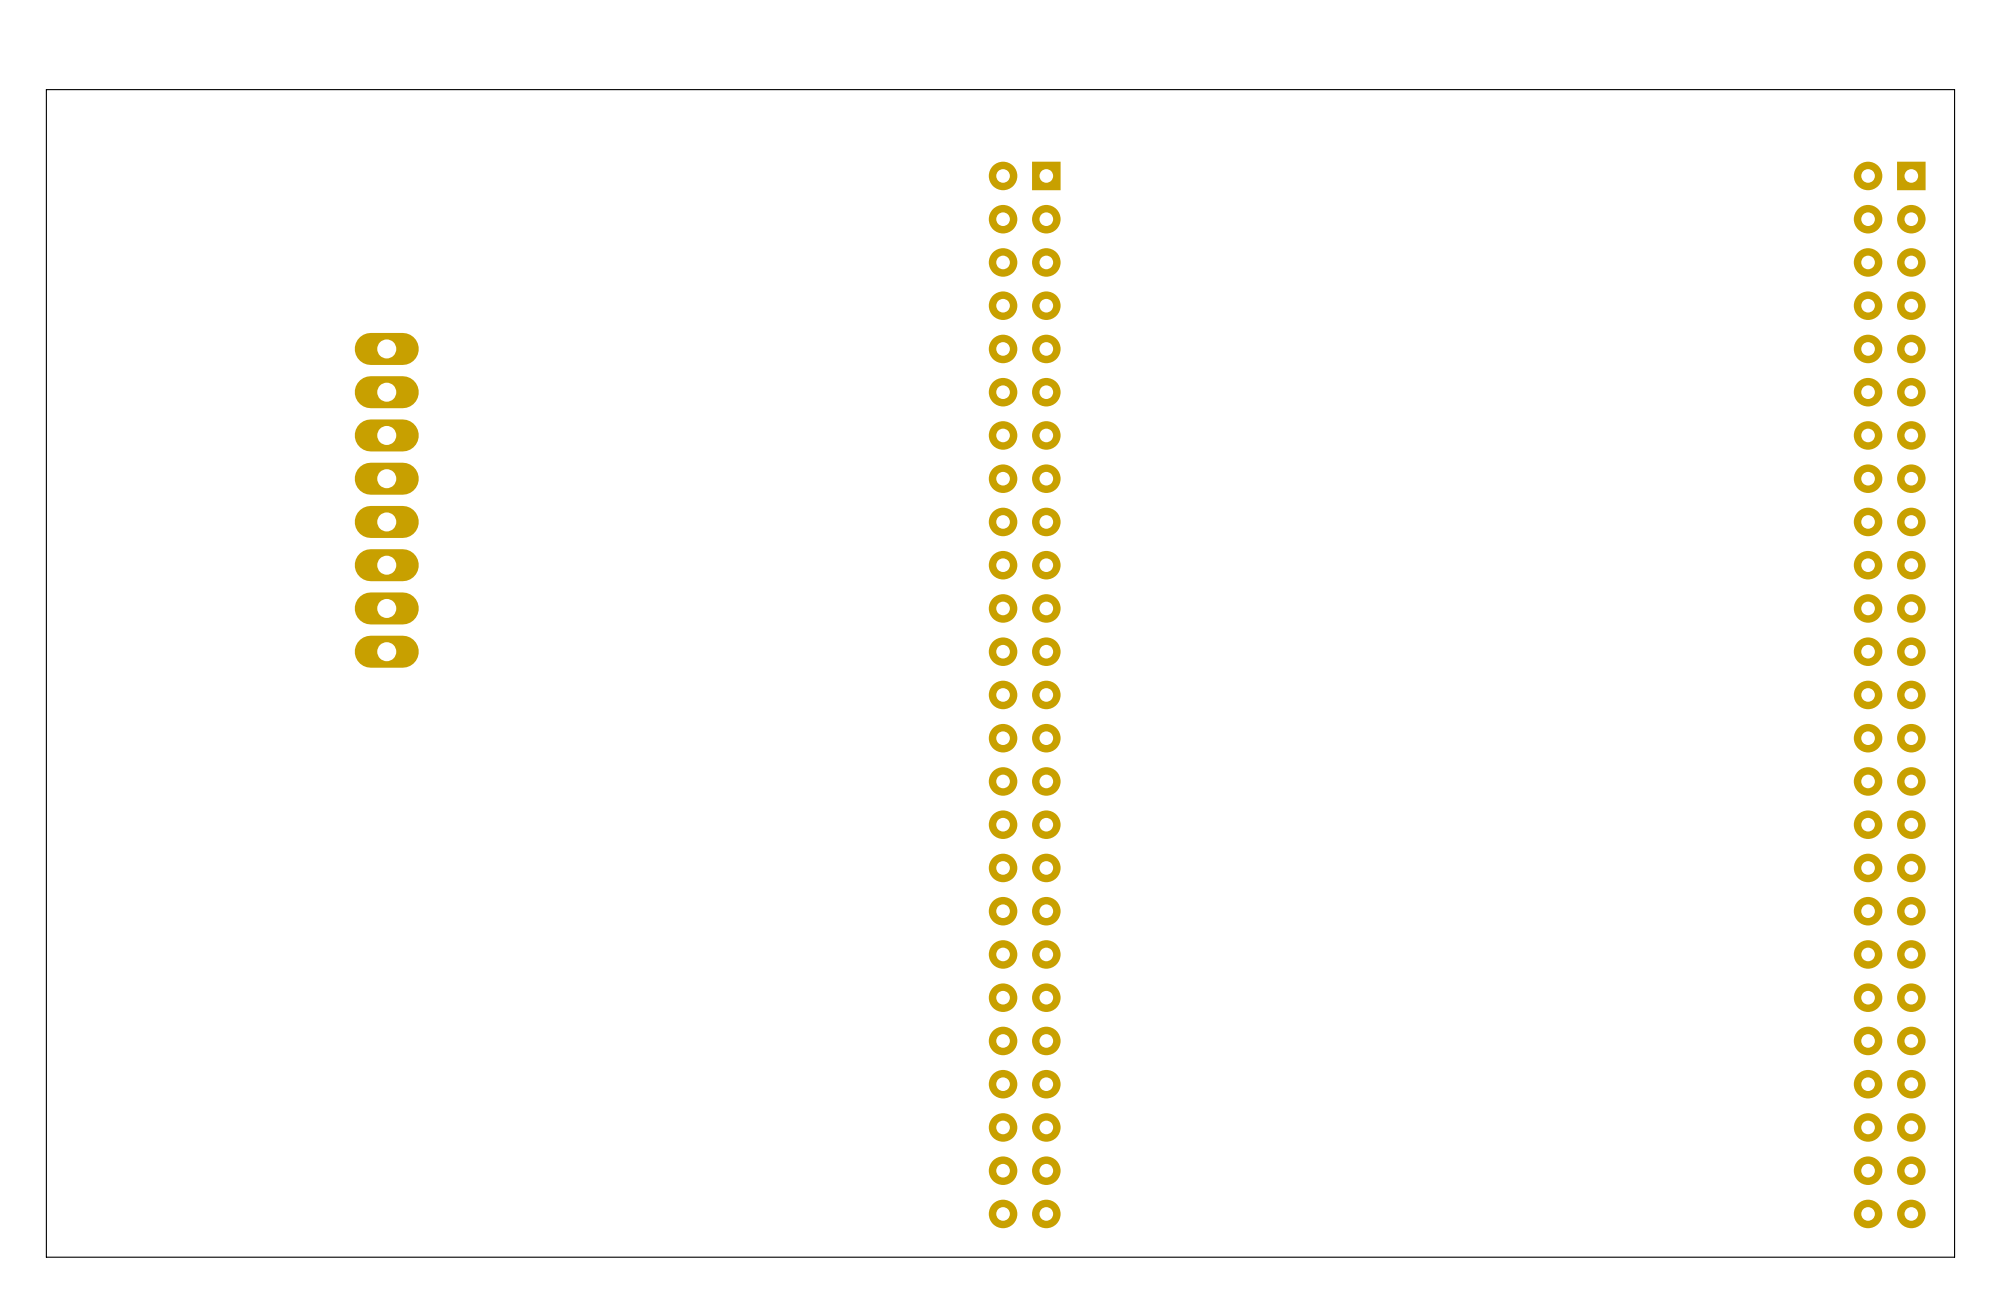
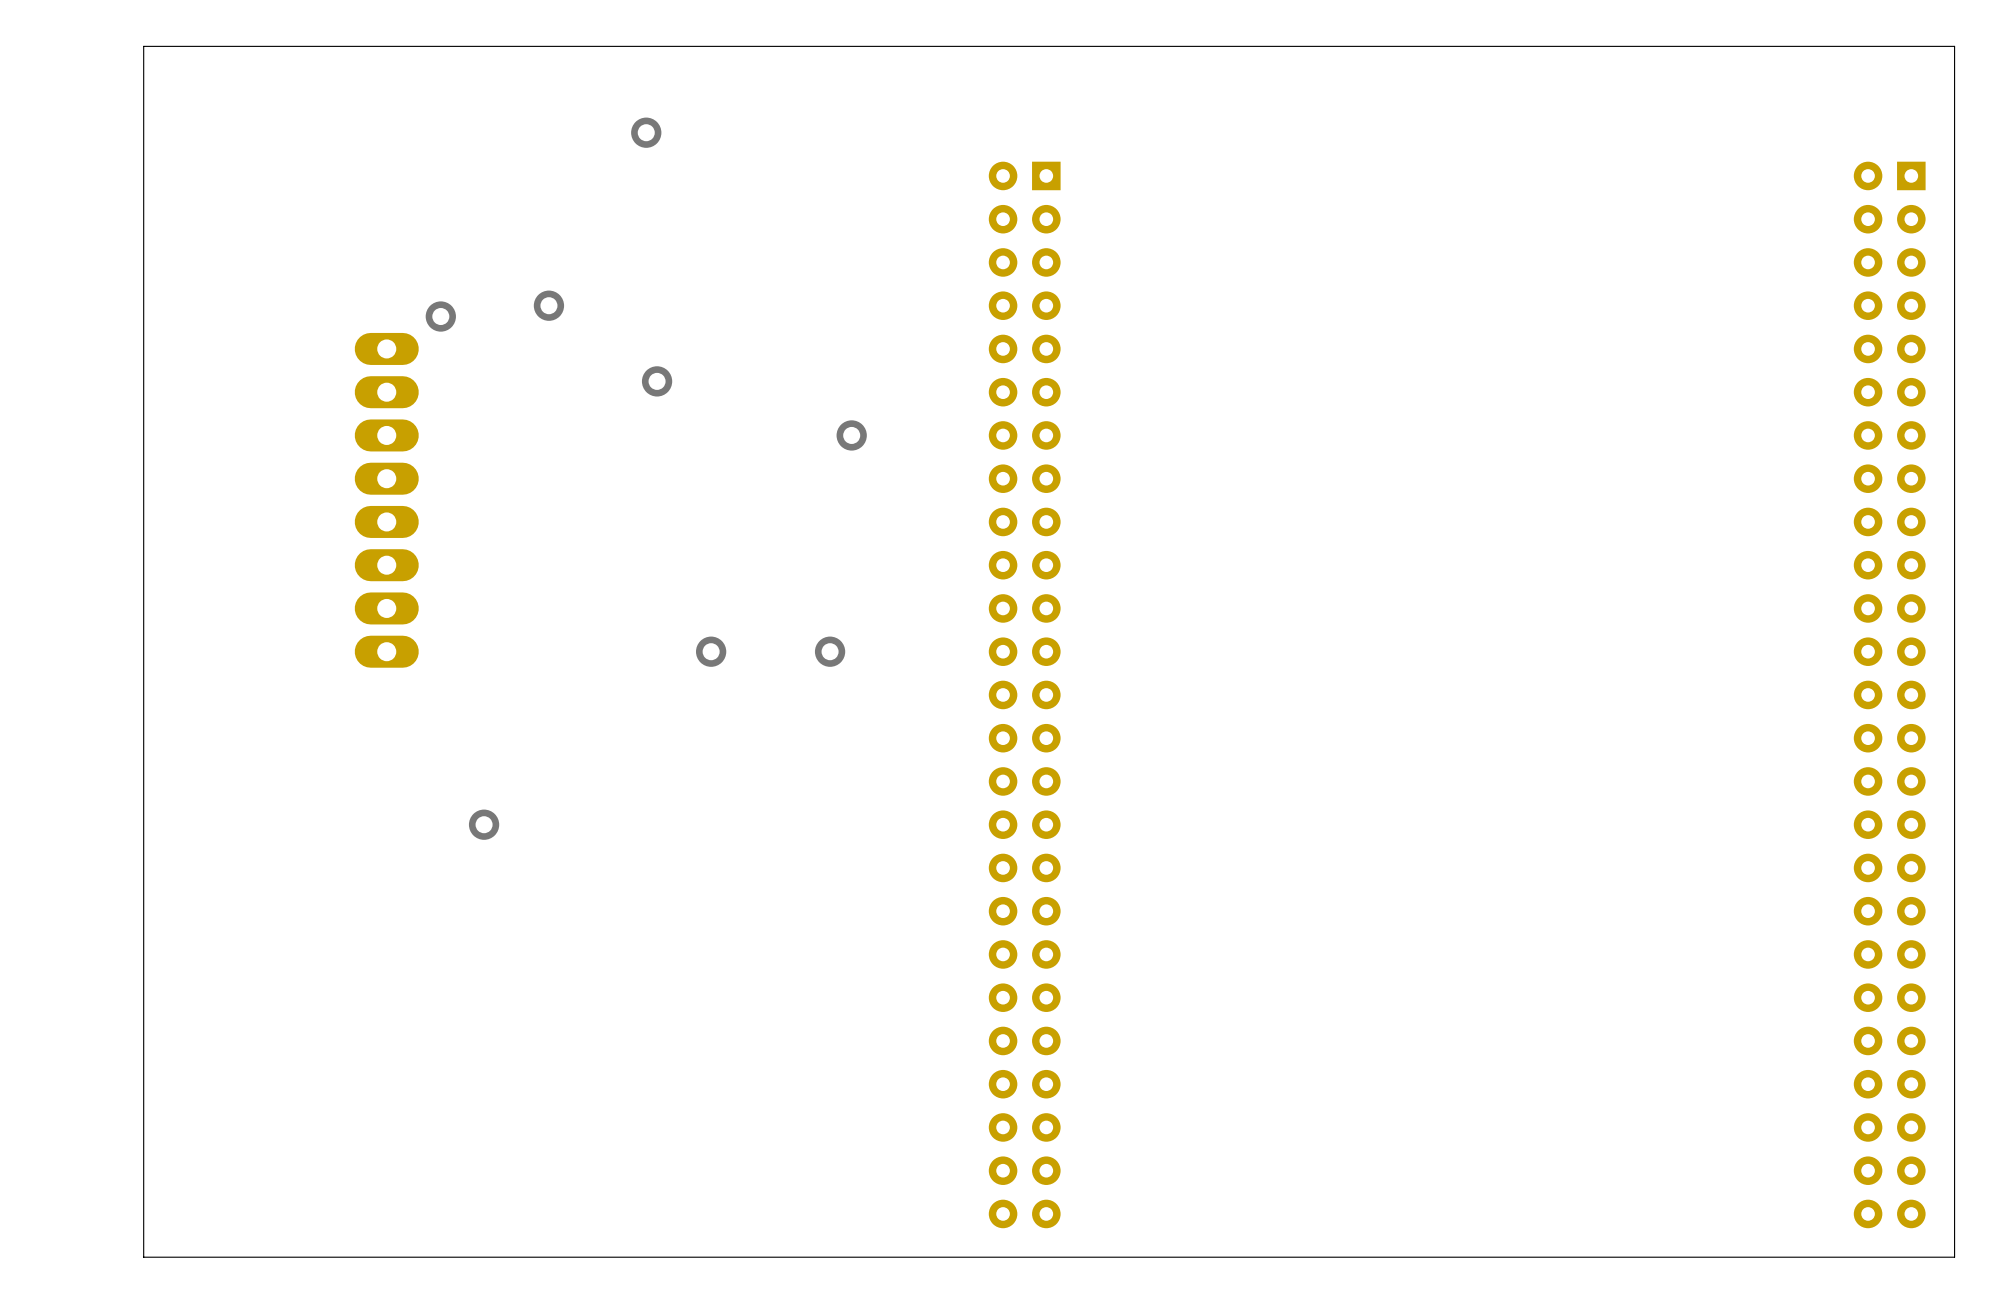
board edge: (1954, 89) (46, 89) (46, 1257) (143, 1257) -> (1954, 89) (1954, 46) (143, 46) (143, 1257)
via: none -> (646, 132)
via: none -> (548, 305)
via: none -> (440, 316)
via: none -> (657, 381)
via: none -> (851, 435)
via: none -> (711, 651)
via: none -> (830, 651)
via: none -> (484, 824)

